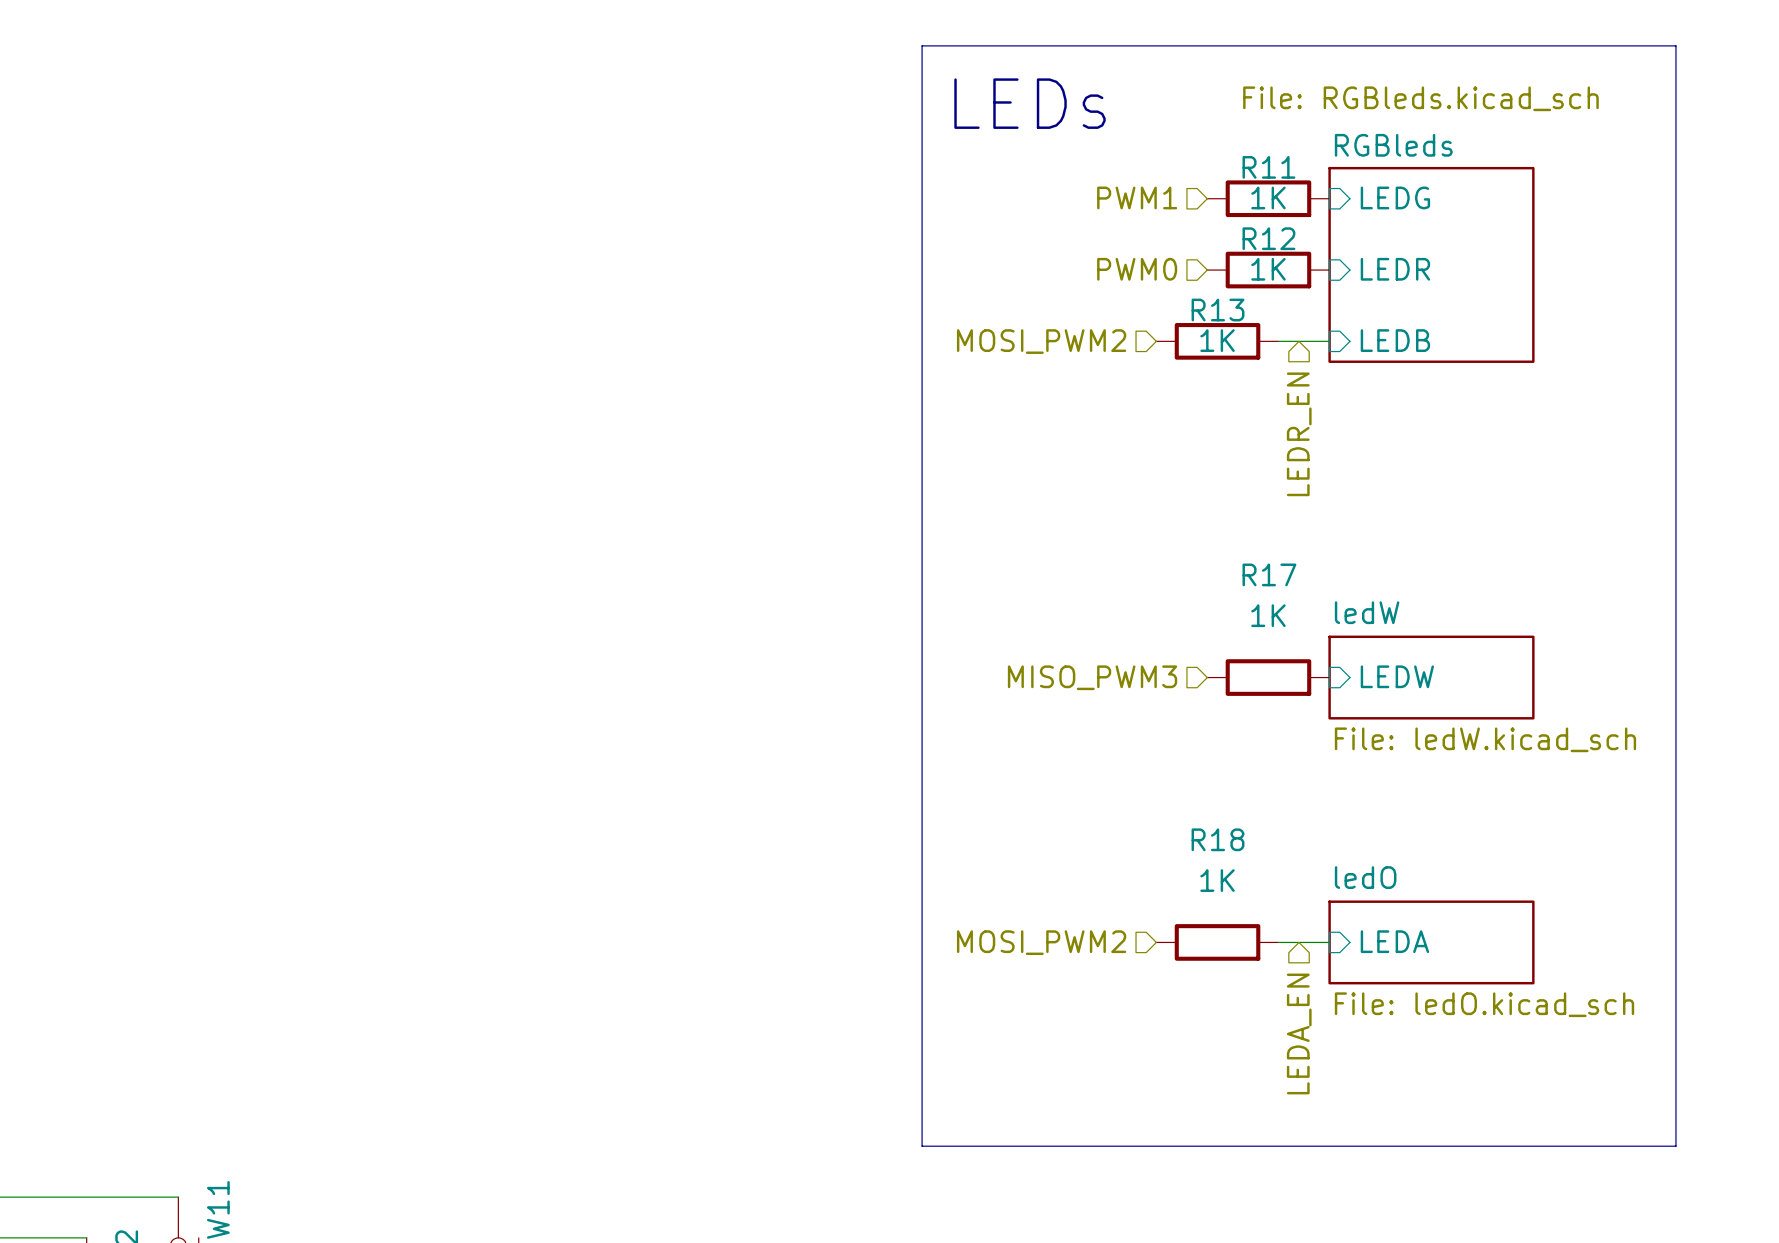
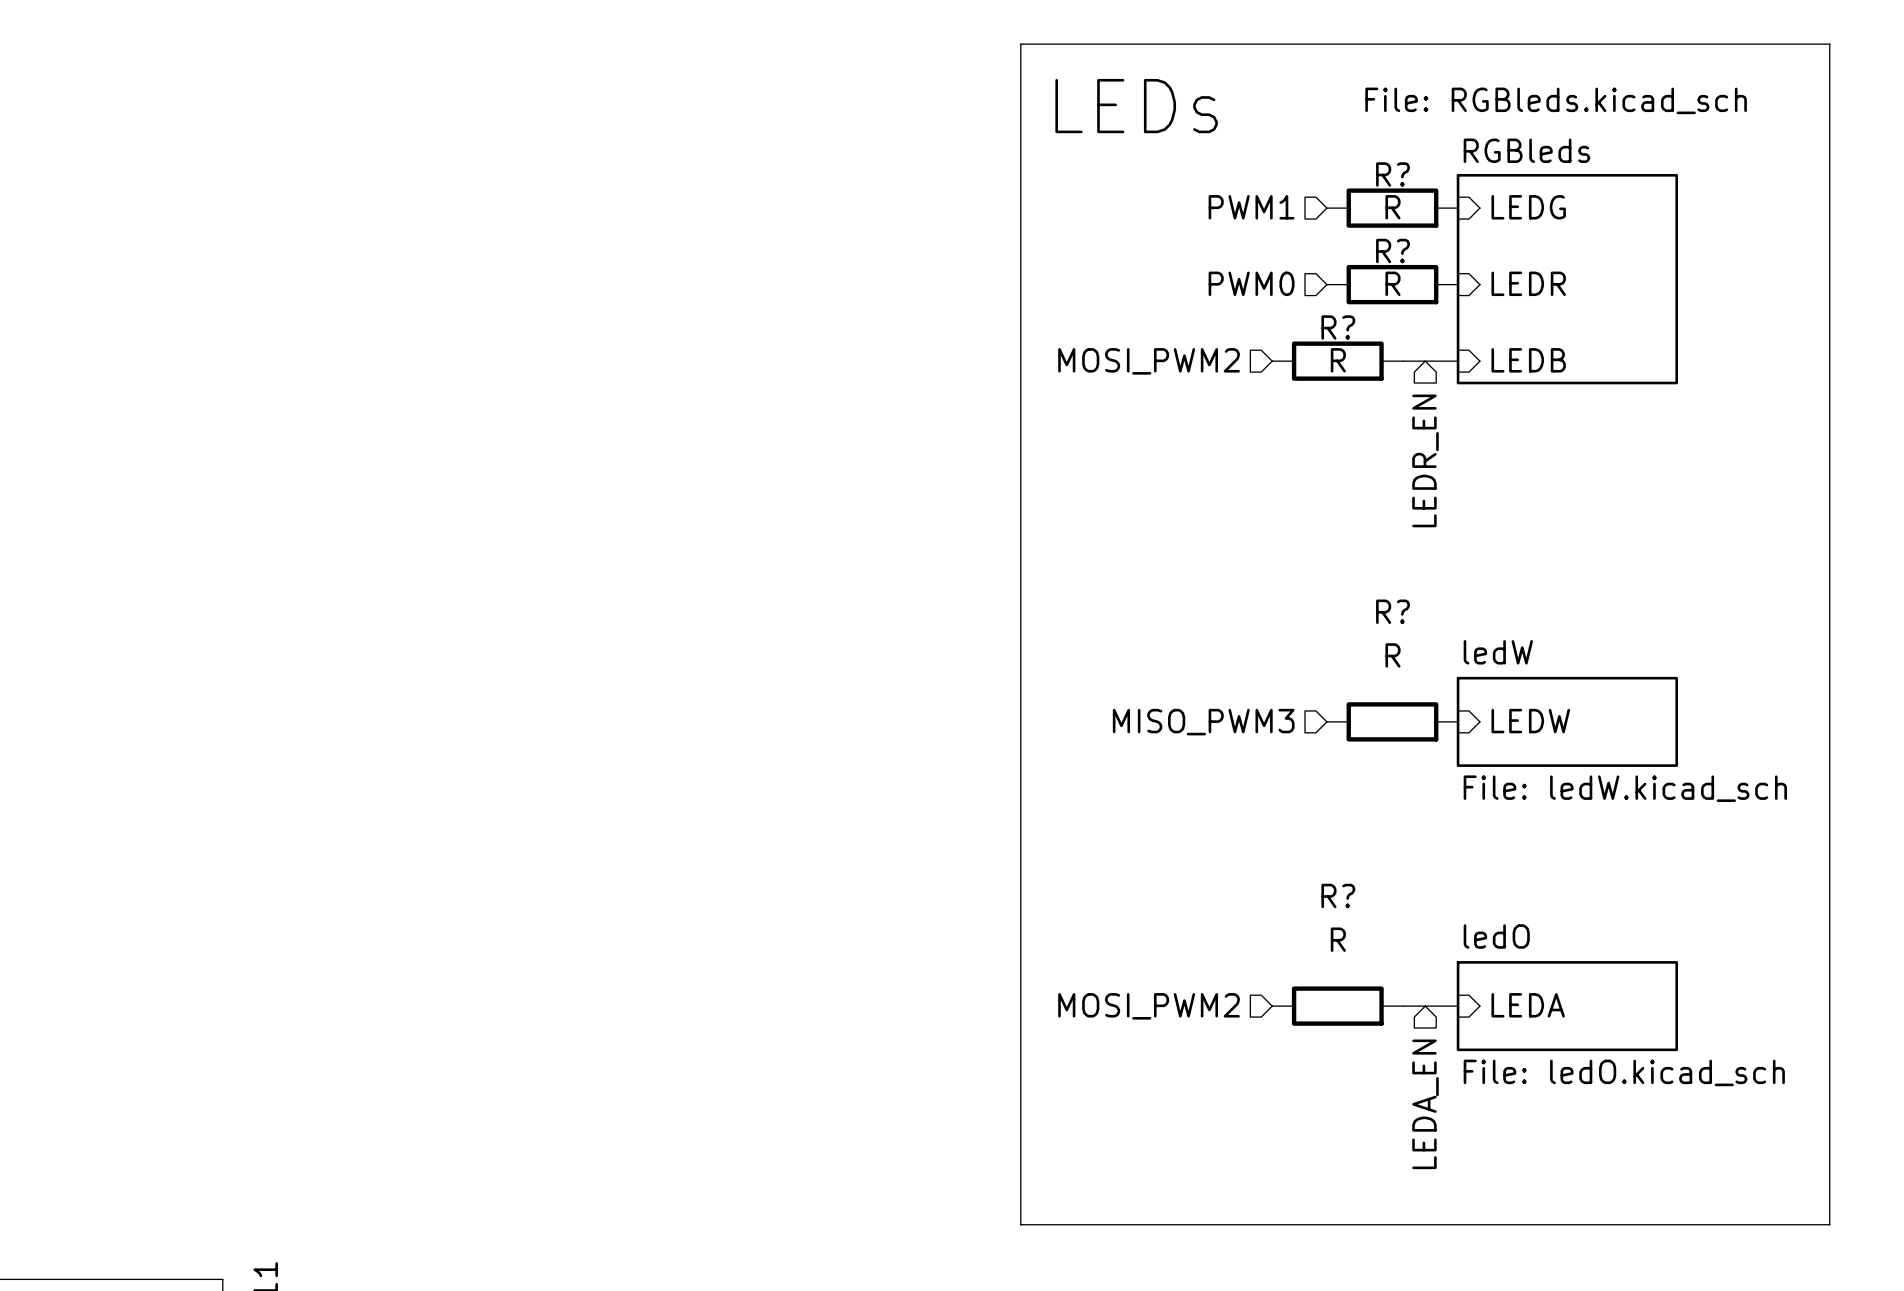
R11 name: R11 (1268, 167) -> R? (1392, 174)
R11 value: 1K (1268, 197) -> R (1392, 207)
R12 name: R12 (1268, 238) -> R? (1392, 251)
R12 value: 1K (1268, 269) -> R (1392, 283)
R13 name: R13 (1218, 310) -> R? (1338, 327)
R13 value: 1K (1217, 340) -> R (1338, 360)
R17 name: R17 (1269, 574) -> R? (1392, 611)
R17 value: 1K (1268, 615) -> R (1392, 655)
R18 name: R18 (1218, 839) -> R? (1338, 895)
R18 value: 1K (1217, 880) -> R (1338, 939)

